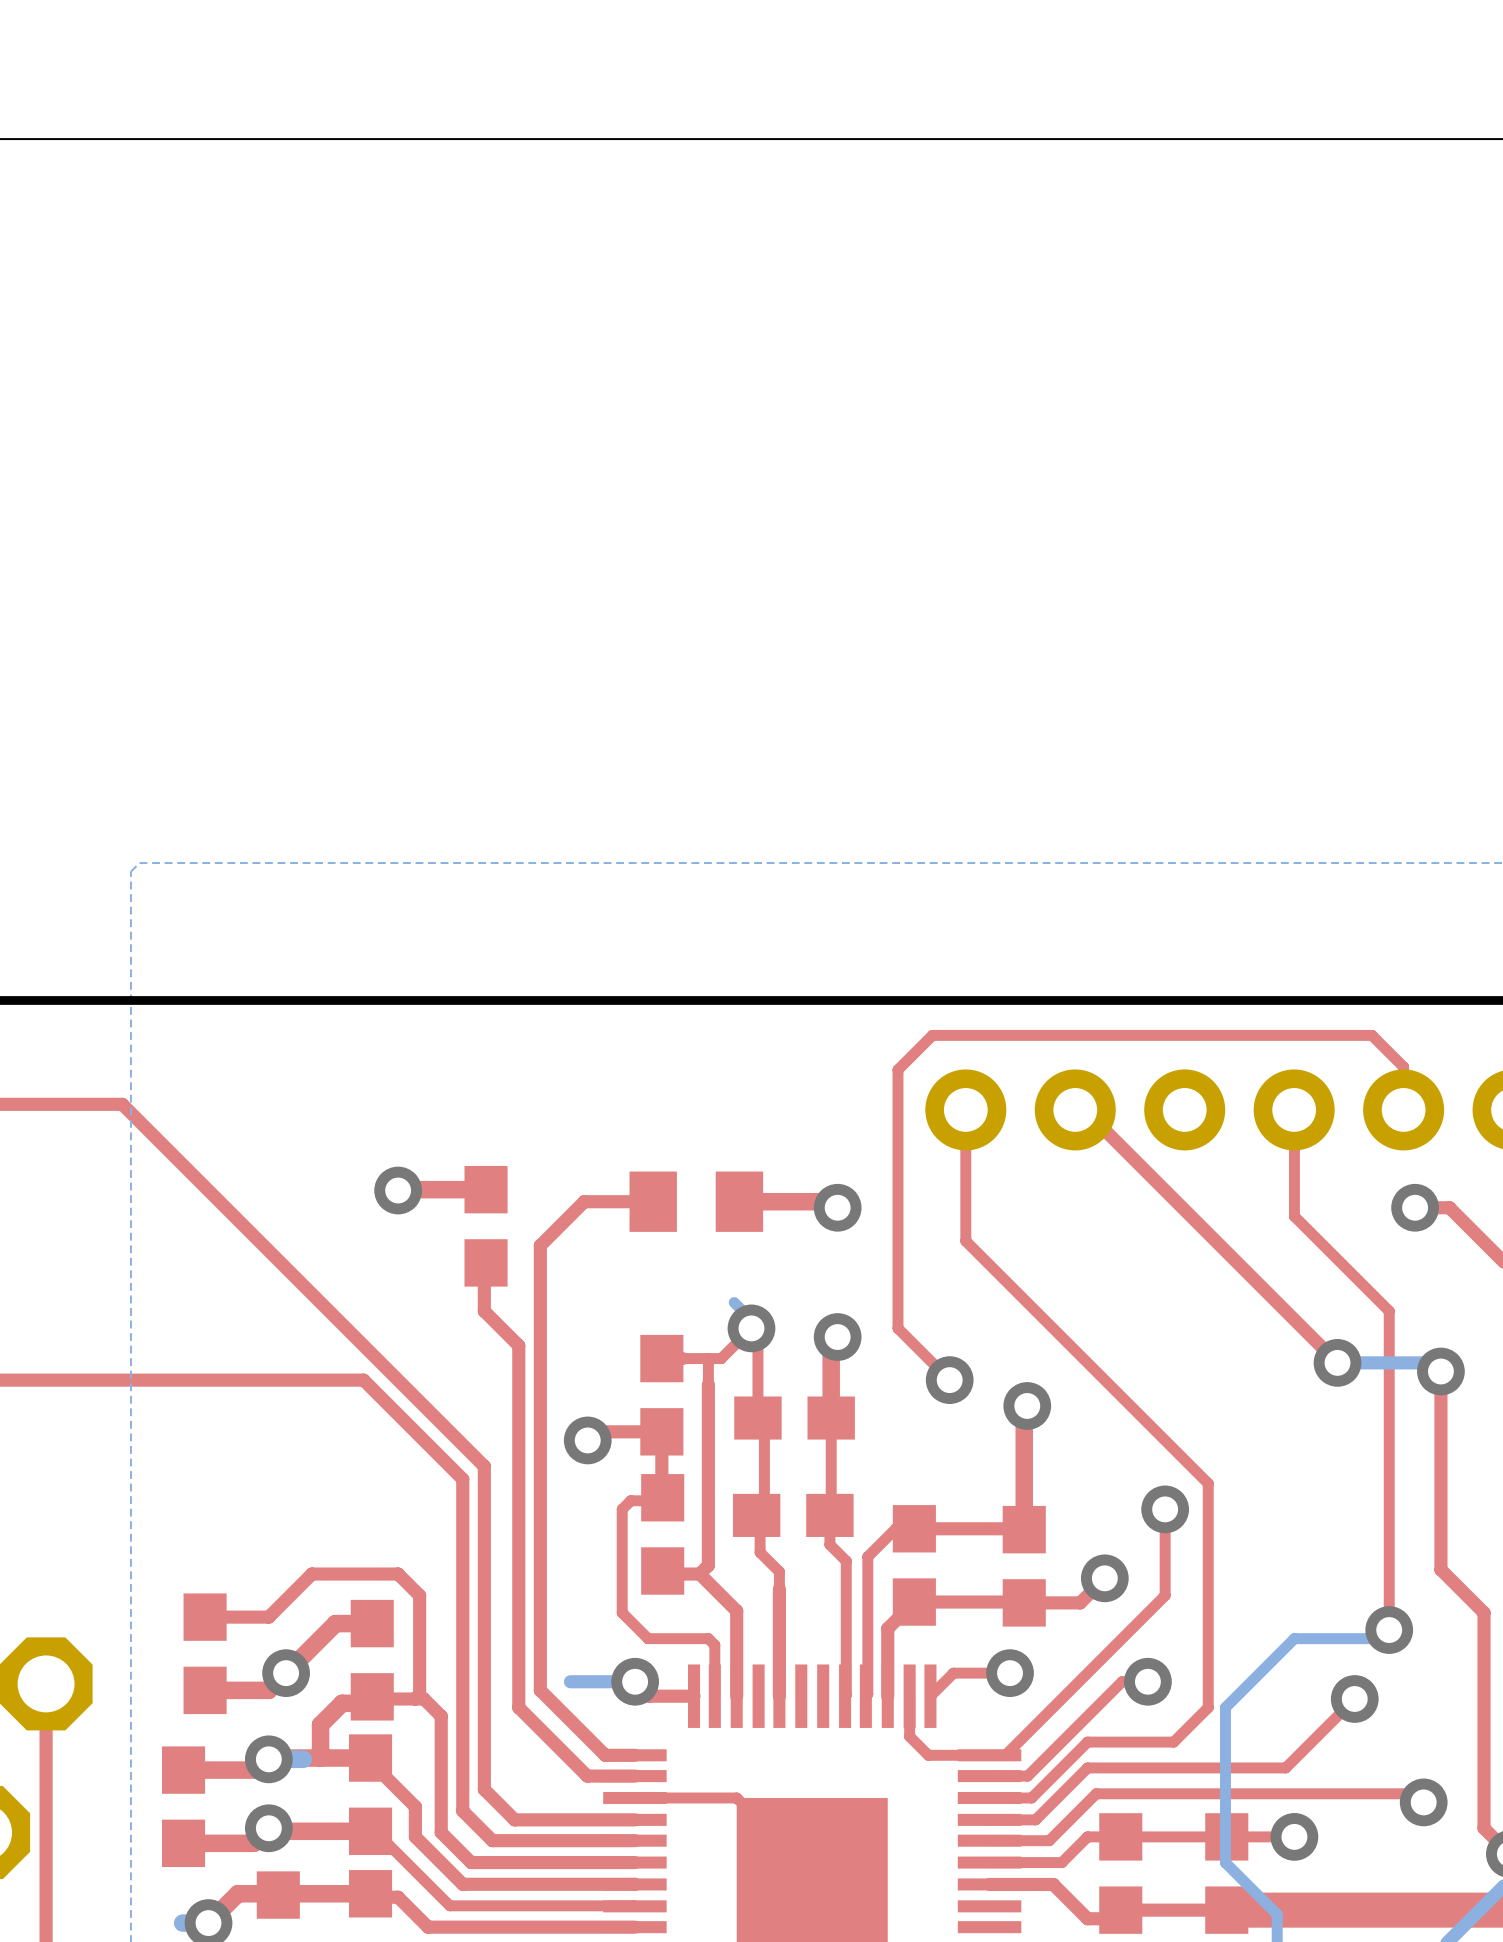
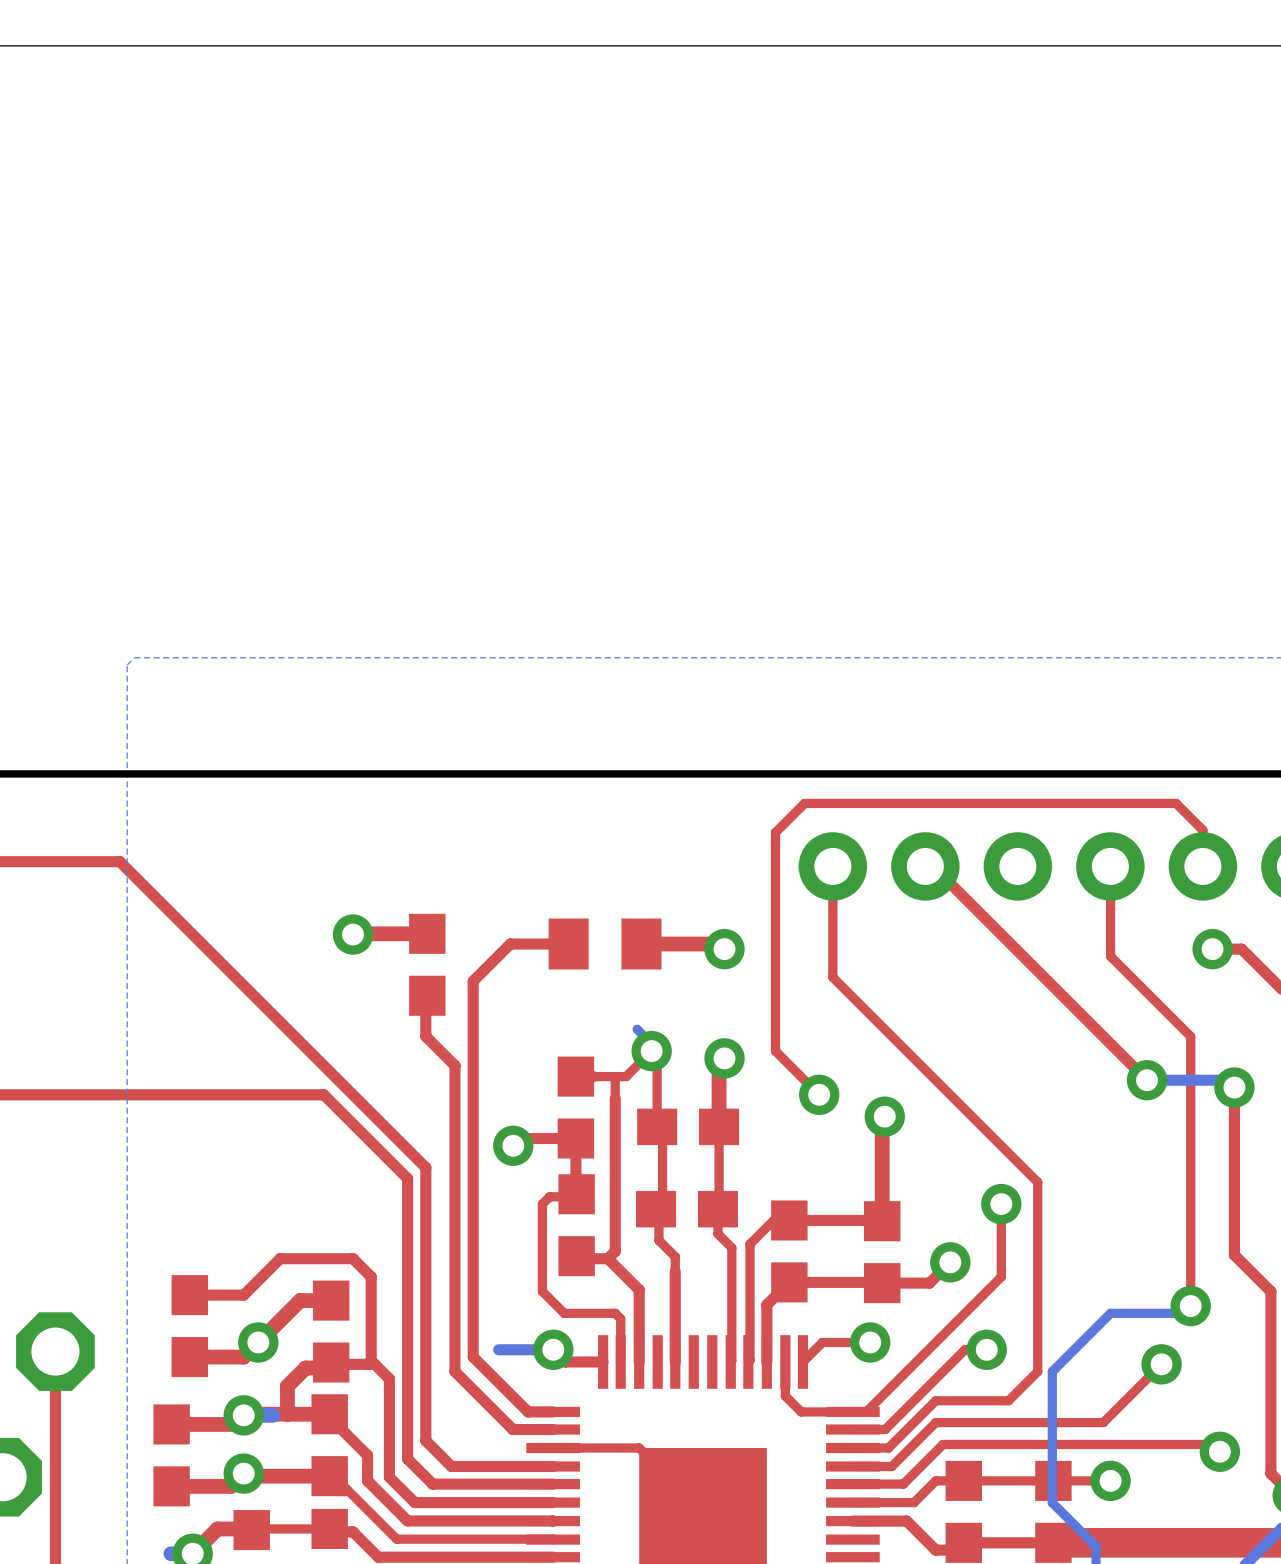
top track width: thick (370, 1893) (279, 1893) -> thin (329, 1528) (252, 1528)

